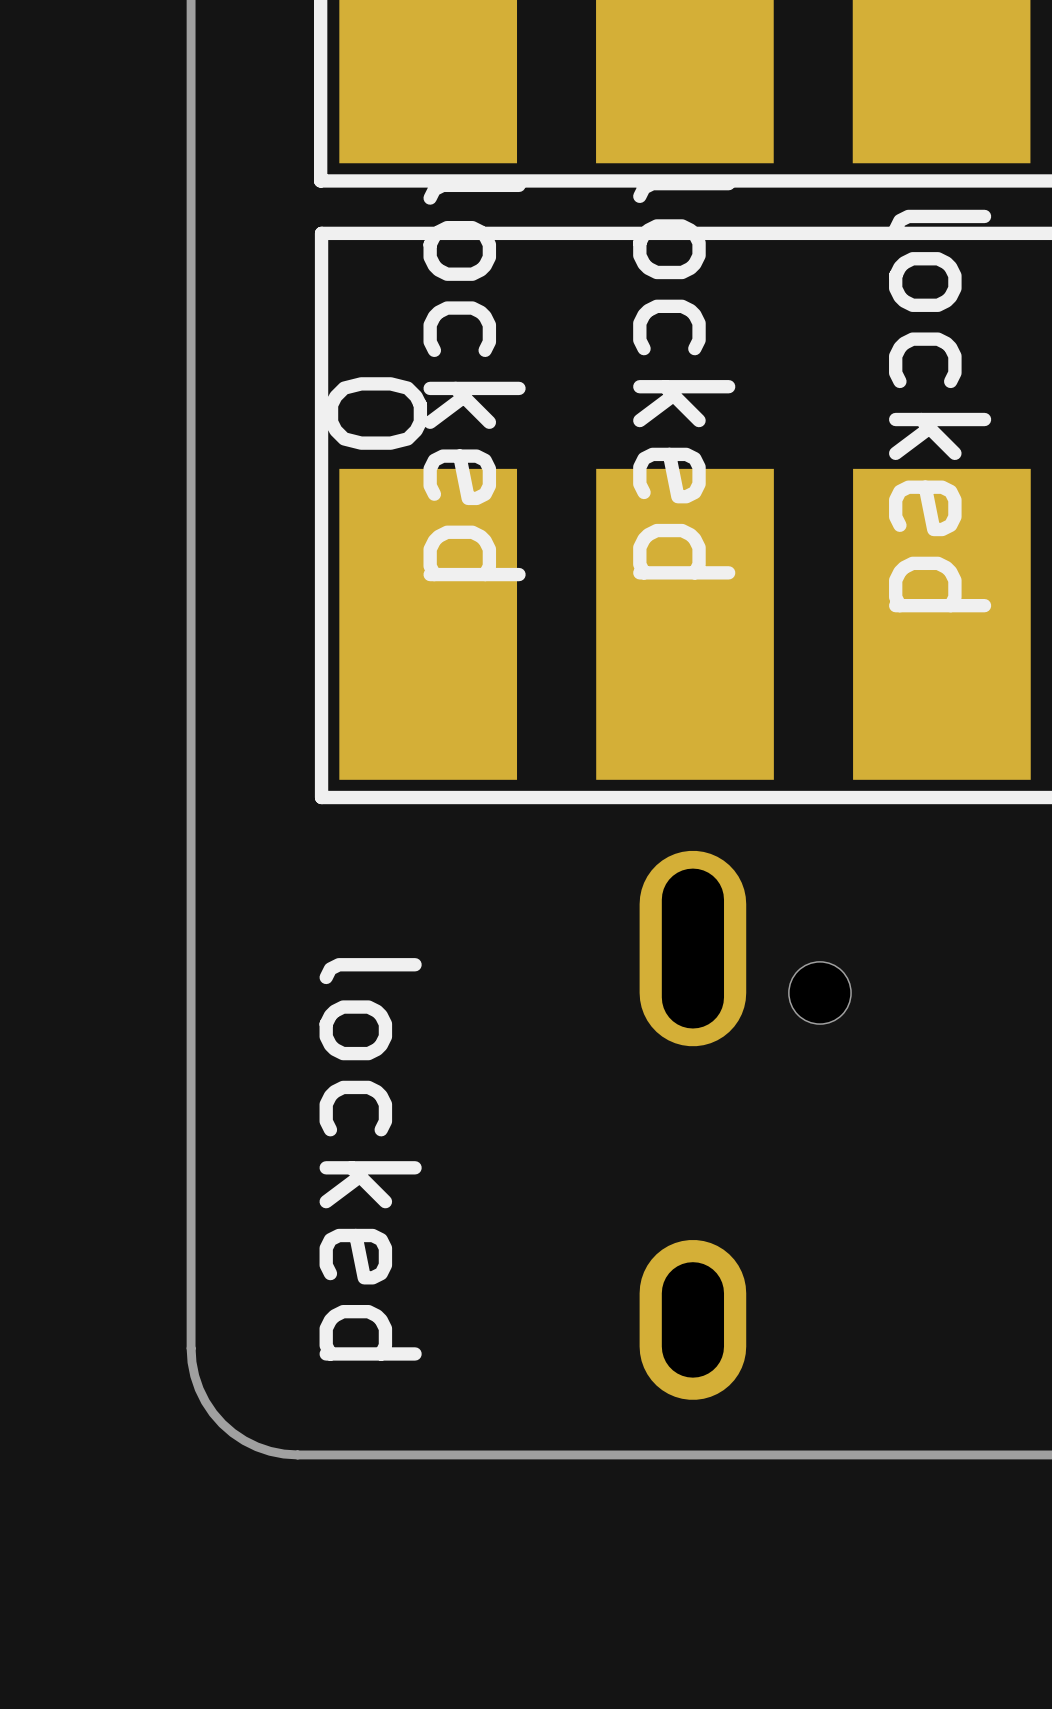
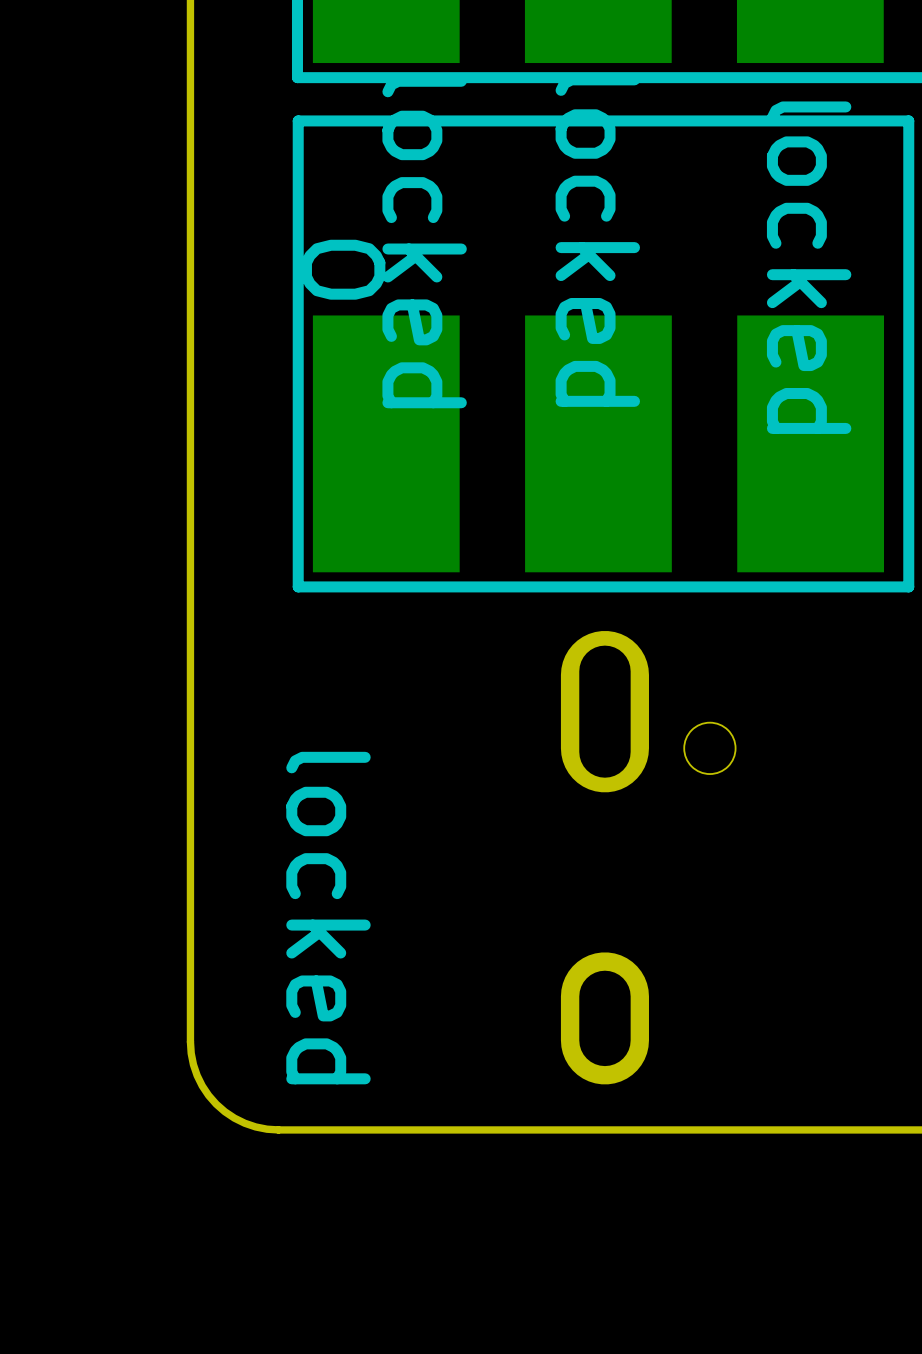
text position: locked (370, 1159) -> locked (328, 918)

